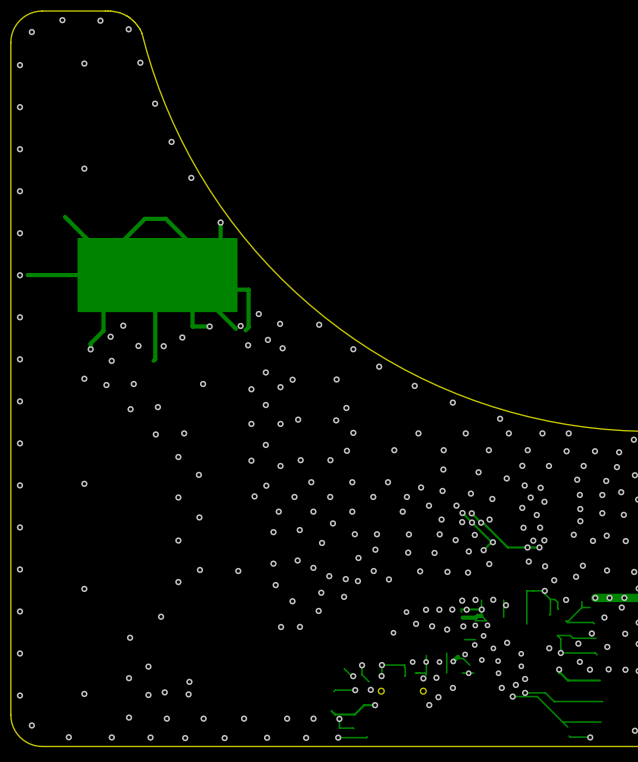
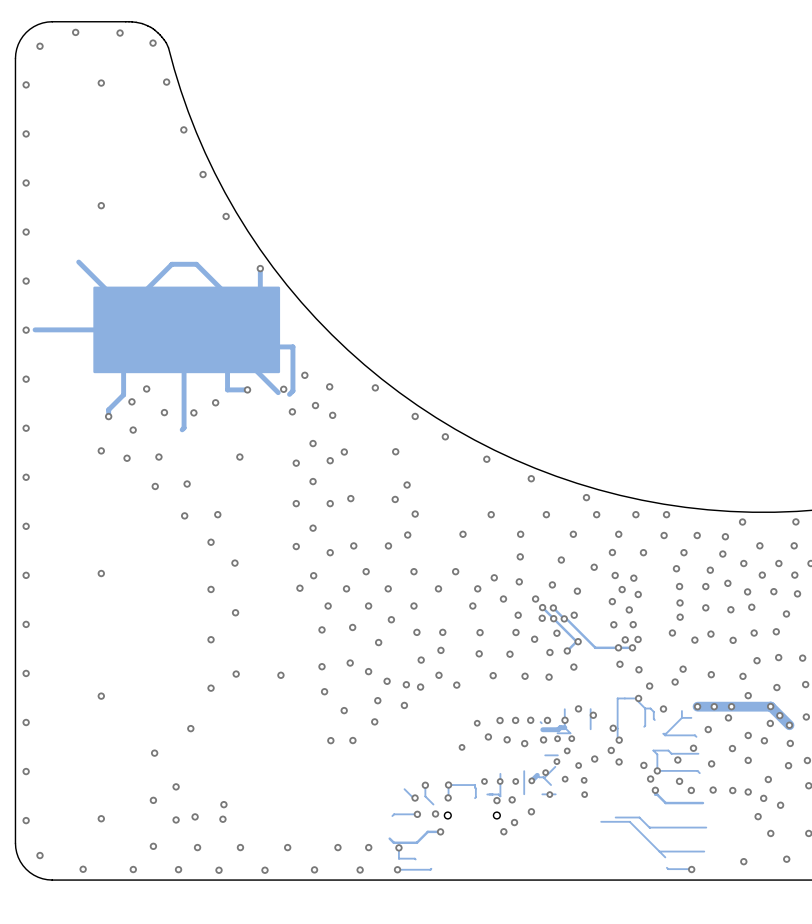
via: (475, 599) -> none
via: (462, 600) -> none
track: (481, 609) (461, 609) -> none
via: none -> (613, 728)
via: none -> (619, 740)
via: none -> (611, 750)
via: none -> (619, 761)
track: none -> (555, 766) (544, 777)
via: (521, 653) -> none
via: none -> (650, 779)
via: (521, 666) -> none
via: (525, 678) -> none
via: (515, 684) -> none
via: (501, 687) -> none
via: (525, 692) -> none
via: (512, 696) -> none

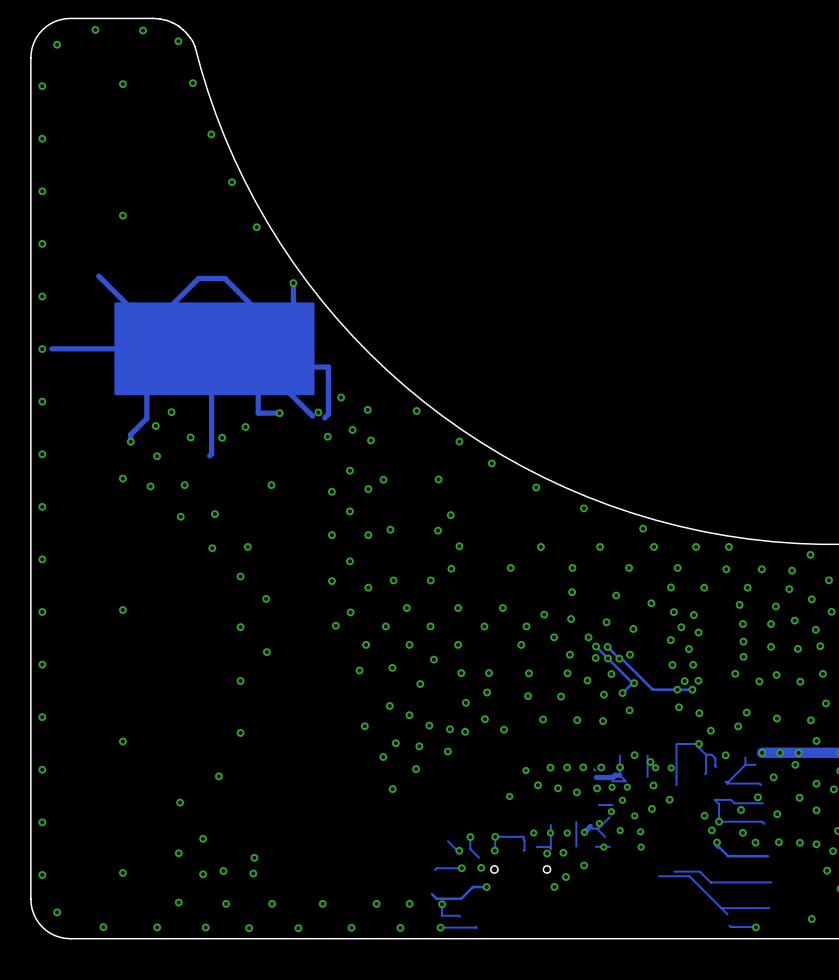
via: (322, 666) -> none
via: (236, 674) -> none
via: (280, 675) -> none
via: none -> (364, 726)
via: (324, 691) -> none
via: none -> (395, 743)
via: none -> (655, 767)
via: none -> (671, 767)
via: (613, 728) -> none
via: none -> (653, 785)
via: (330, 740) -> none
via: (619, 740) -> none
via: (619, 761) -> none

